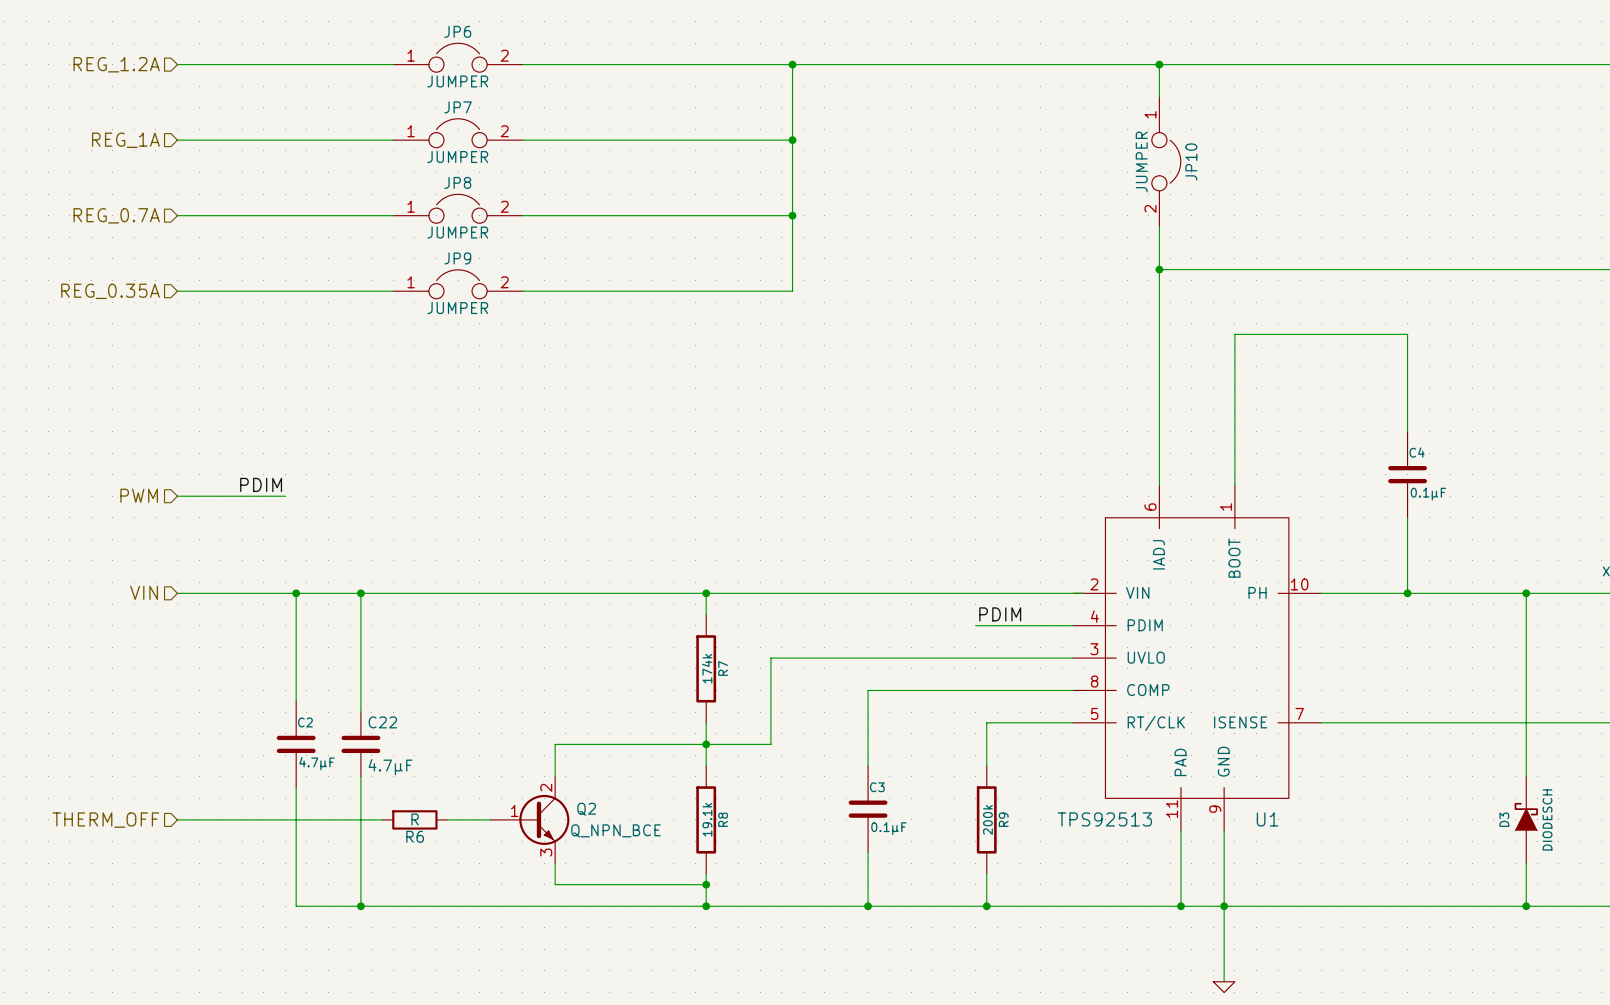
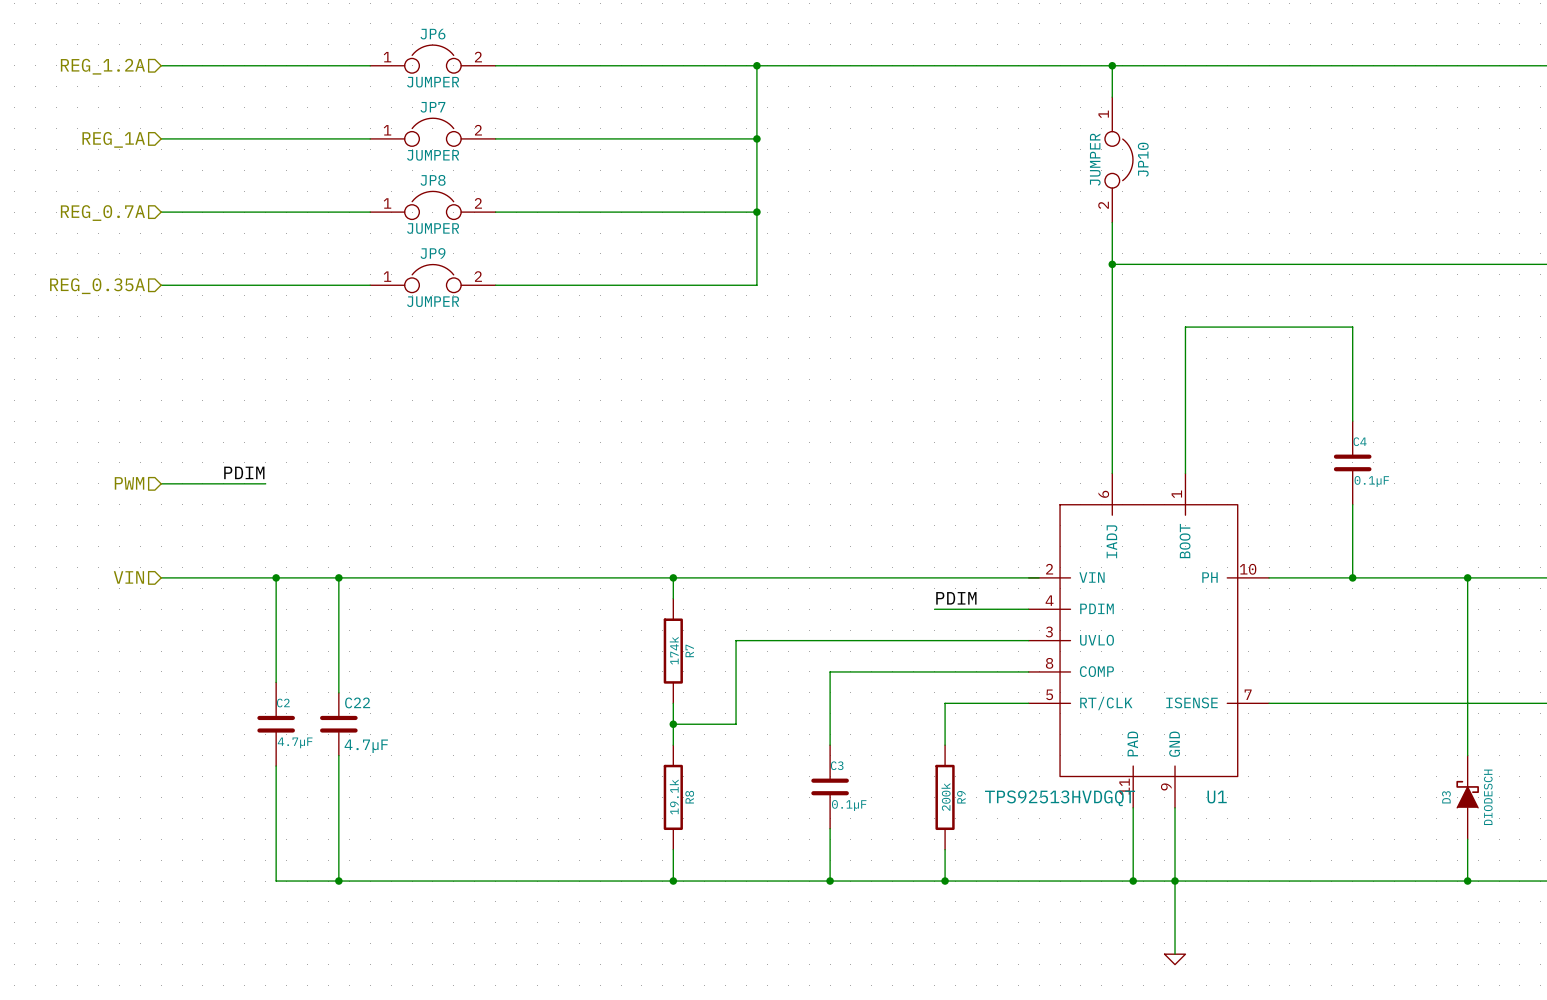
wire: (706, 744) (555, 744) (555, 776) -> none
wire: (177, 819) (382, 819) -> none
R6: R (414, 819) -> none
wire: (447, 819) (490, 819) -> none
Q2: Q_NPN_BCE (529, 819) -> none
U1 value: TPS92513 (1104, 819) -> TPS92513HVDGQT (1060, 798)
hierarchical label: THERM_OFF (105, 820) -> none
wire: (555, 863) (555, 884) (706, 884) -> none
junction: (706, 884) -> none

